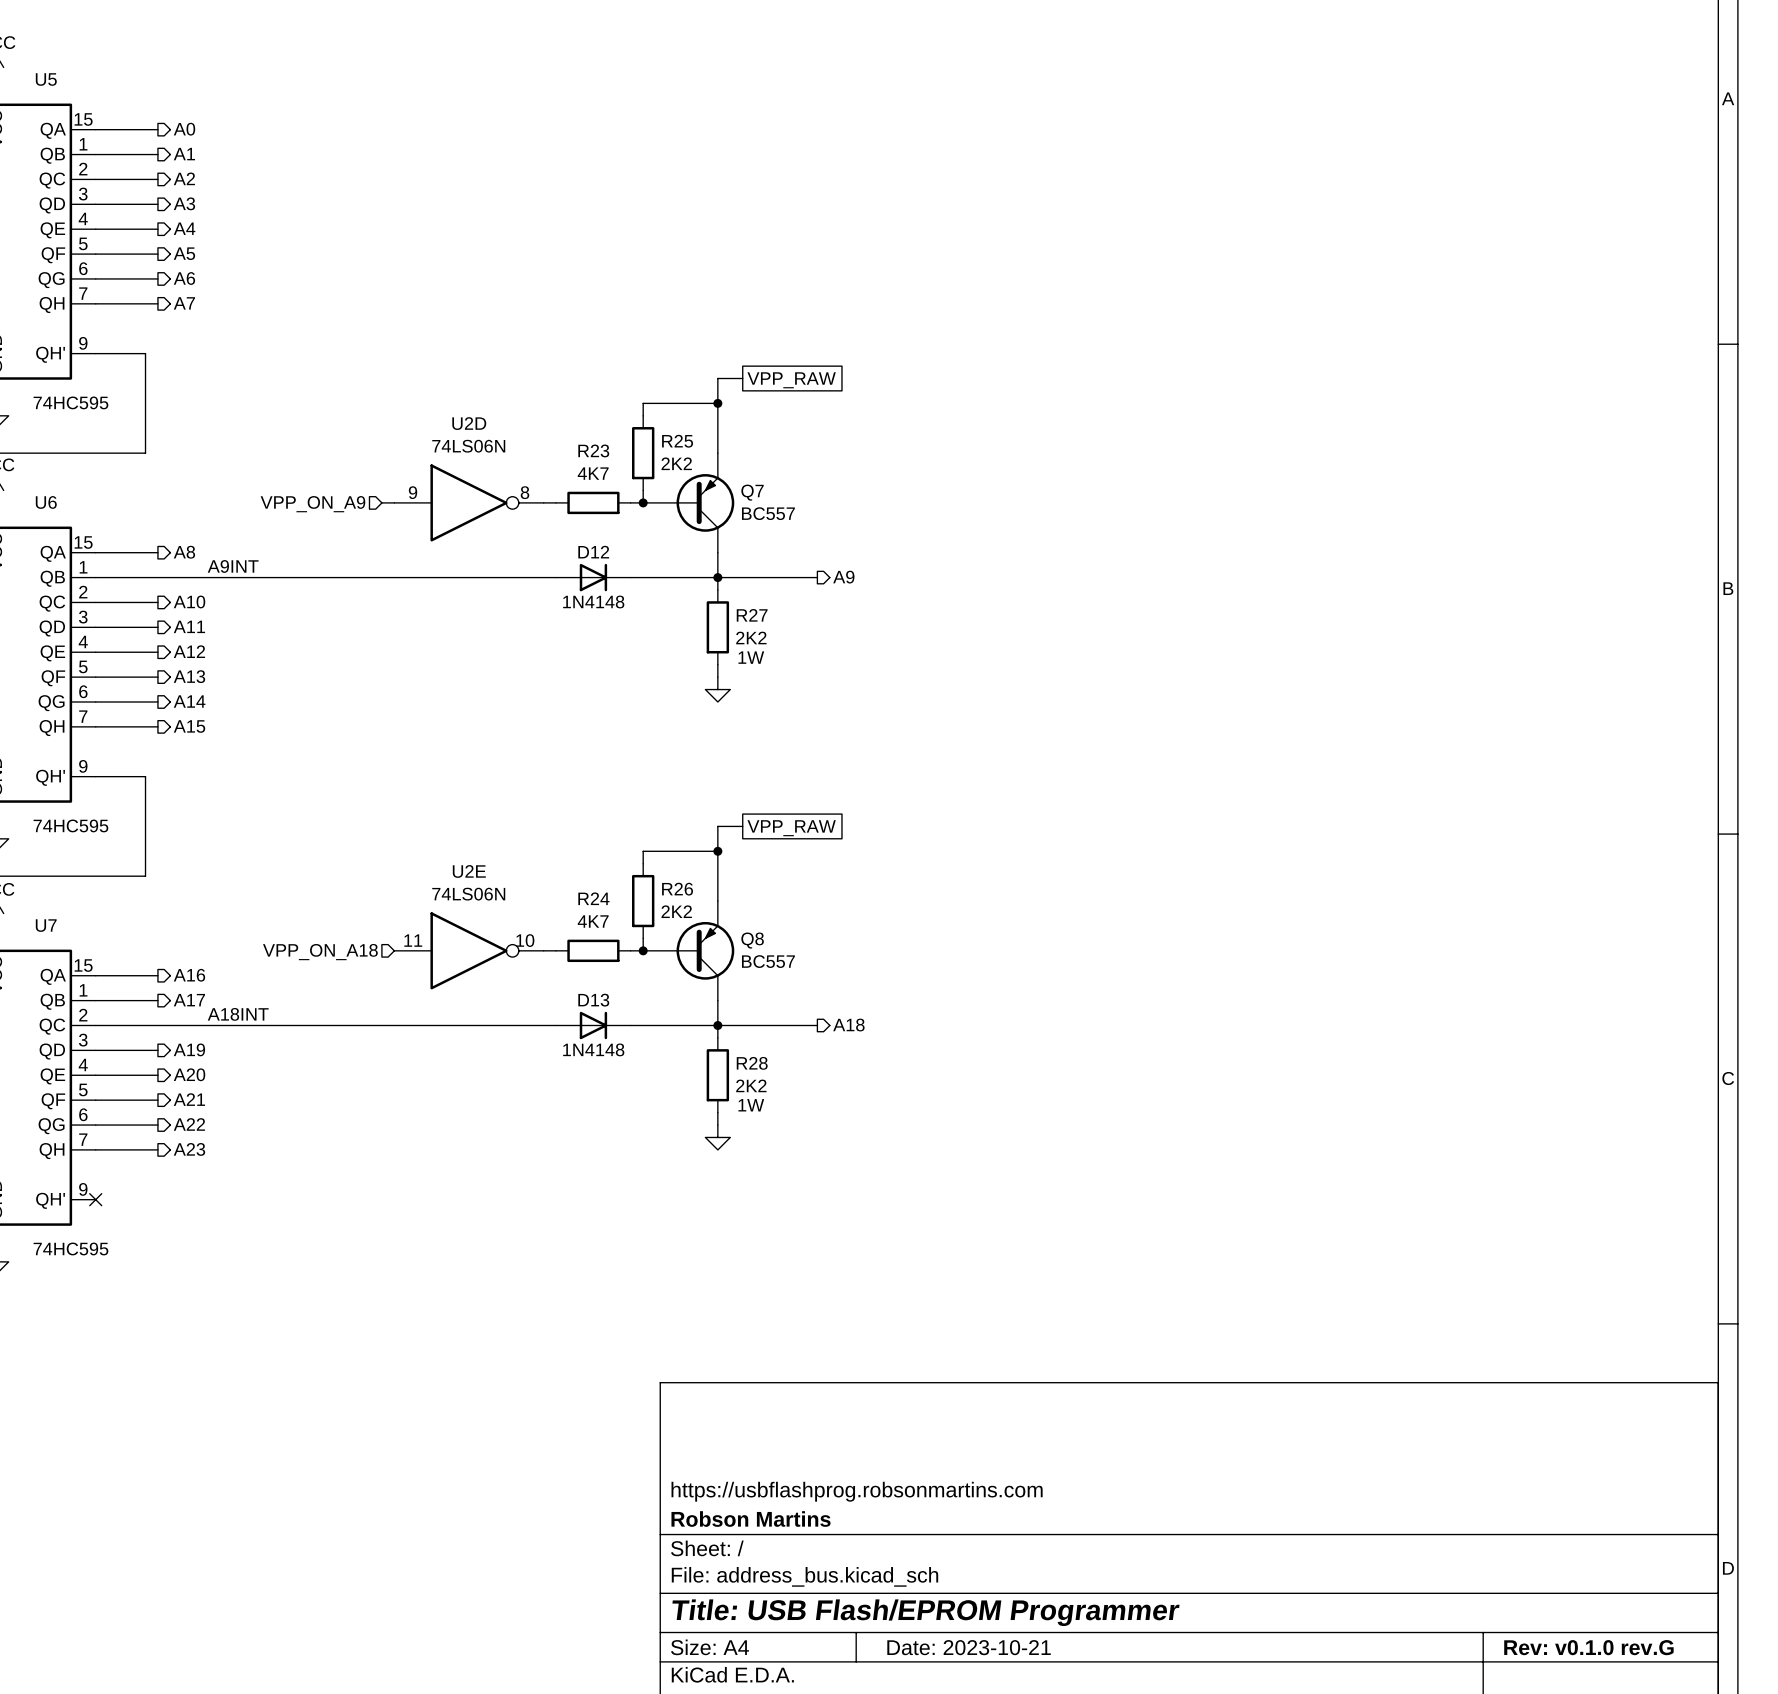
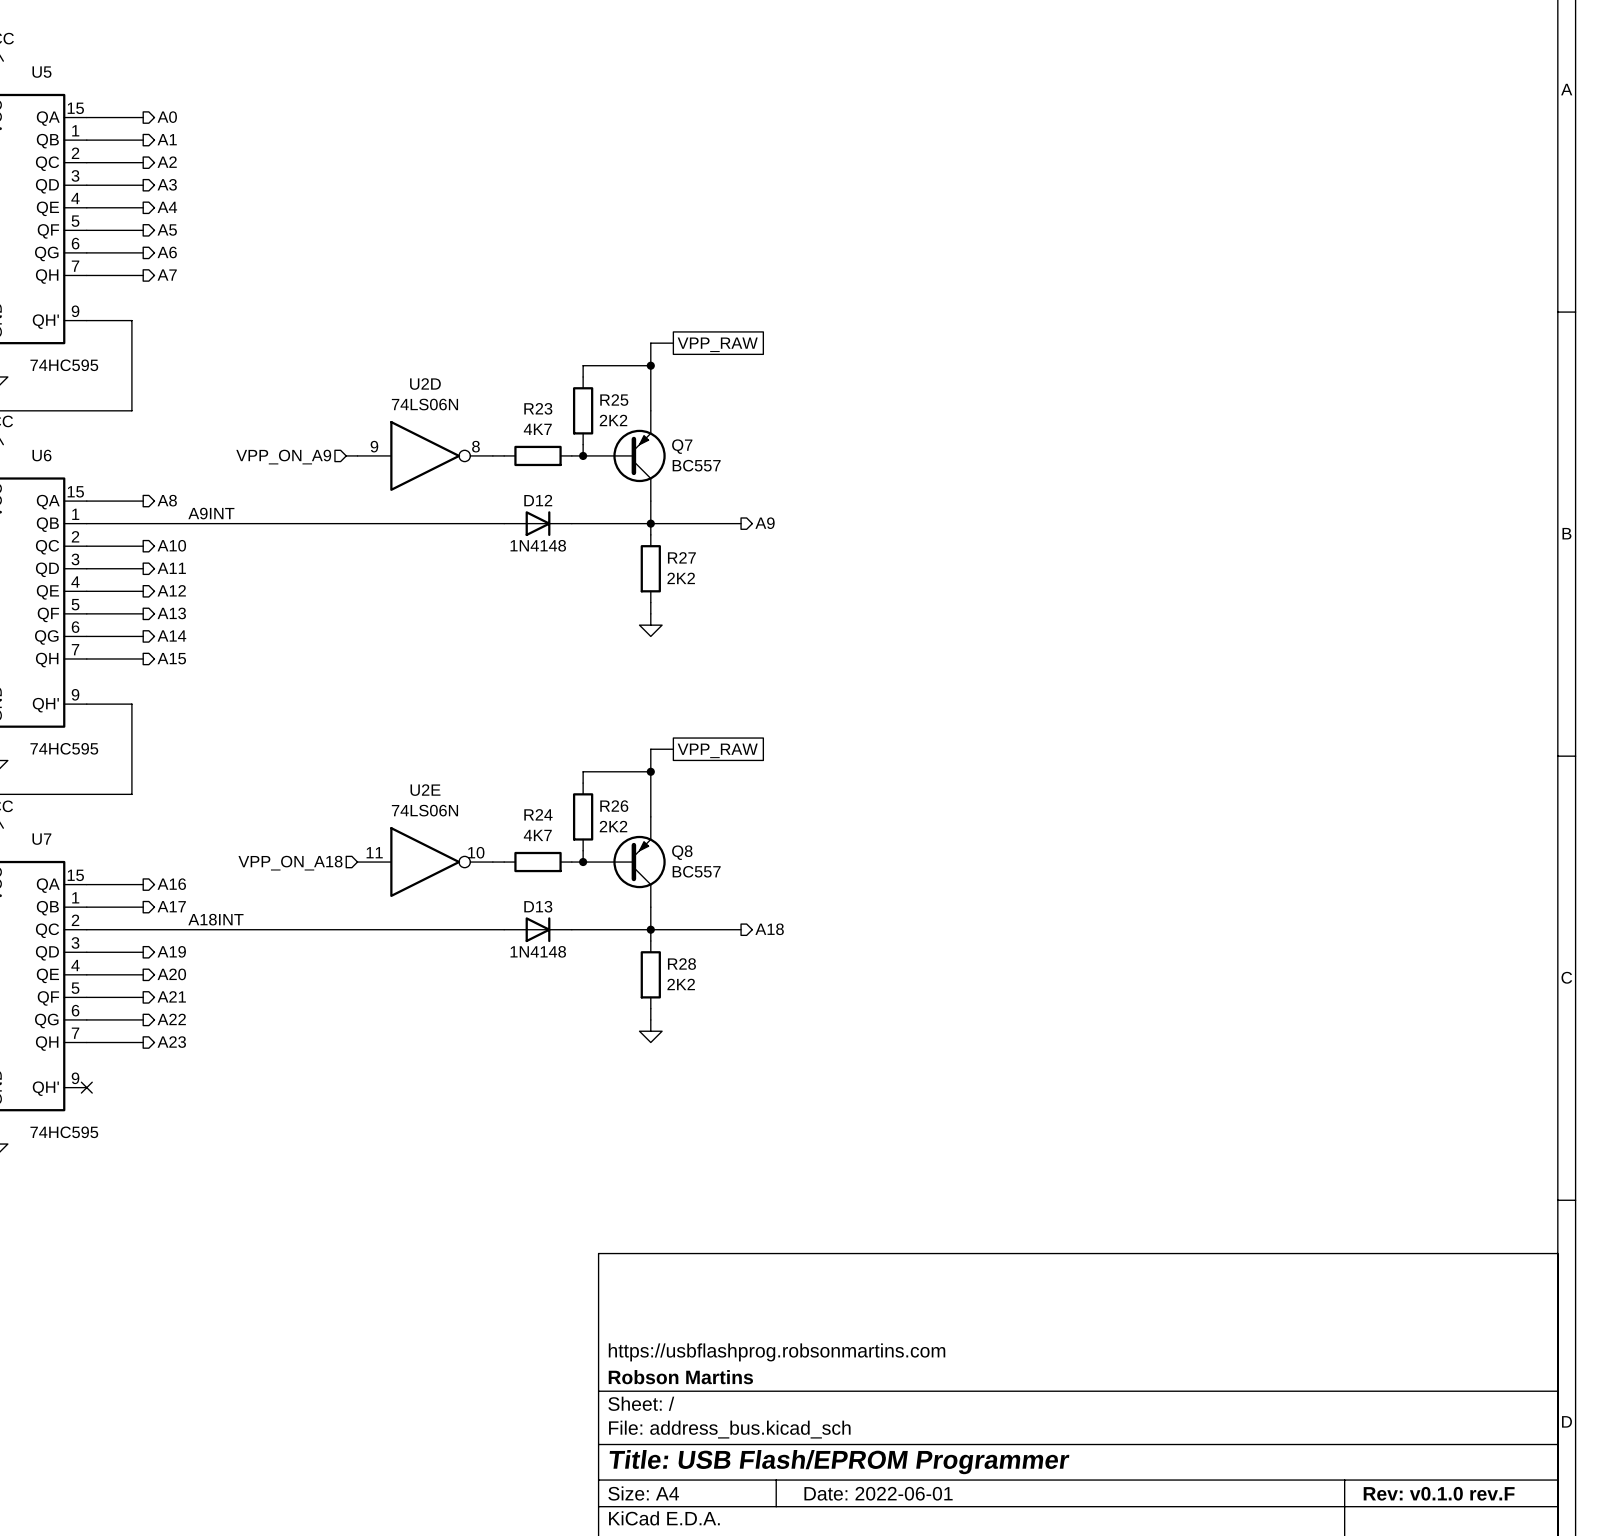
text: 1W (751, 657) -> none
text: 1W (751, 1105) -> none
title block: Date: 2023-10-21 (969, 1647) -> Date: 2022-06-01 (878, 1493)
title block: Rev: v0.1.0 rev.G (1588, 1647) -> Rev: v0.1.0 rev.F (1439, 1493)

